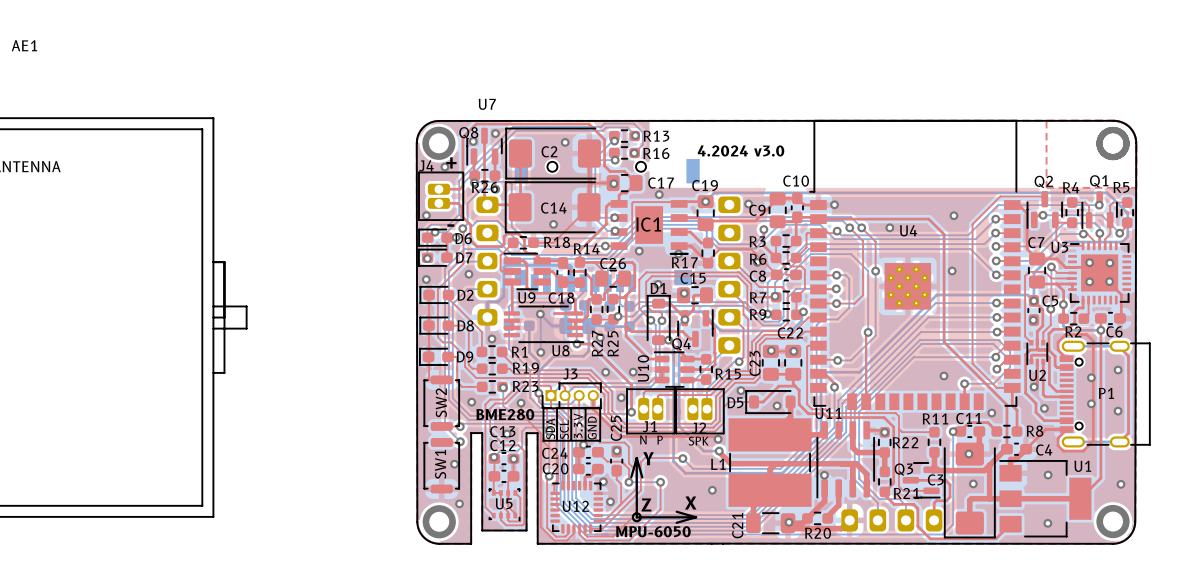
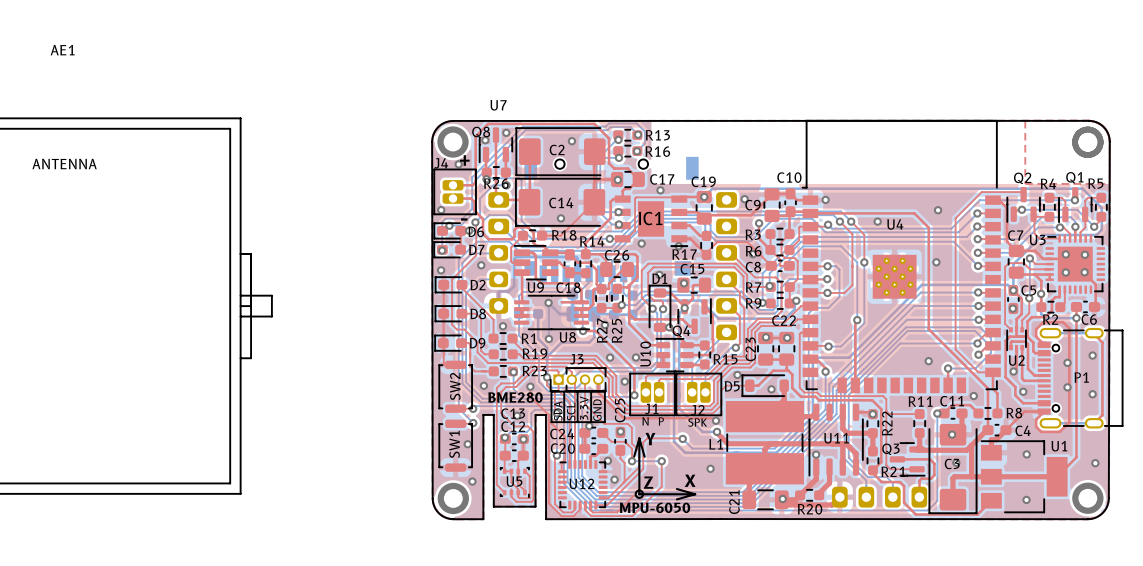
text: 4.2024 v3.0 (741, 150) -> none
U11 name position: U11 (828, 413) -> U11 (836, 438)
R22 name rotation: 0° (905, 442) -> 90° counterclockwise (887, 423)
C3 name position: C3 (935, 479) -> C3 (952, 463)

